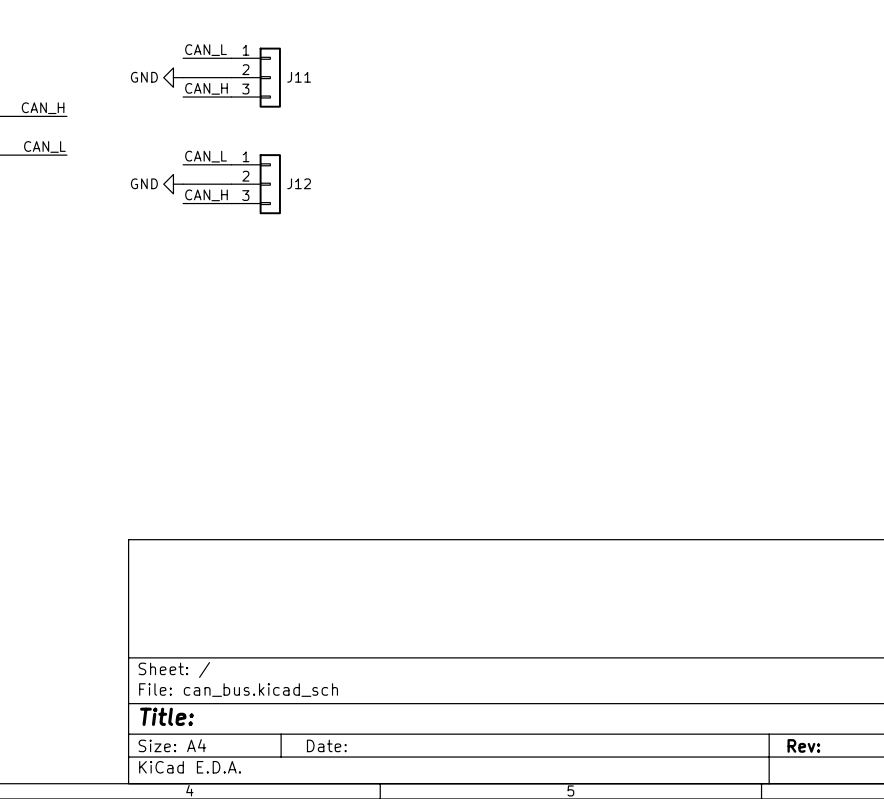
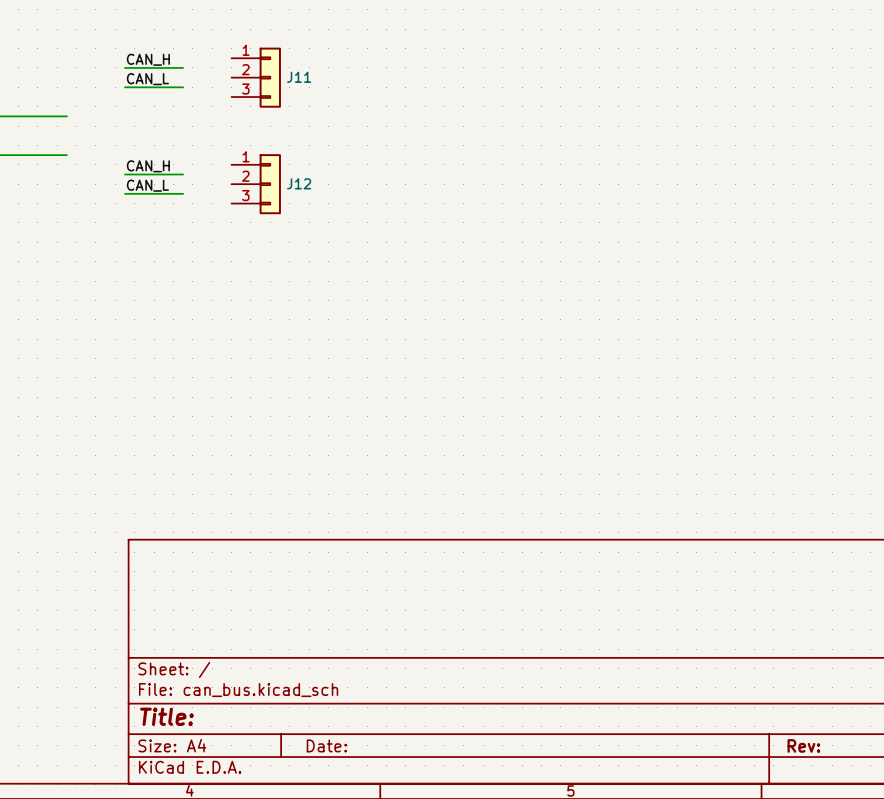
label: CAN_L (206, 50) -> none
wire: (183, 58) (231, 58) -> none
label: none -> CAN_H (148, 59)
wire: none -> (125, 67) (183, 67)
power symbol: GND (173, 77) -> none
wire: (183, 77) (231, 77) -> none
label: none -> CAN_L (147, 79)
wire: none -> (125, 87) (183, 87)
label: CAN_H (206, 88) -> none
wire: (183, 97) (231, 97) -> none
label: CAN_H (43, 108) -> none
label: CAN_L (44, 146) -> none
label: CAN_L (206, 156) -> none
wire: (183, 164) (231, 164) -> none
label: none -> CAN_H (148, 166)
wire: none -> (125, 174) (183, 174)
power symbol: GND (173, 184) -> none
wire: (183, 184) (231, 184) -> none
label: none -> CAN_L (147, 185)
wire: none -> (125, 193) (183, 193)
label: CAN_H (206, 195) -> none
wire: (183, 203) (231, 203) -> none

